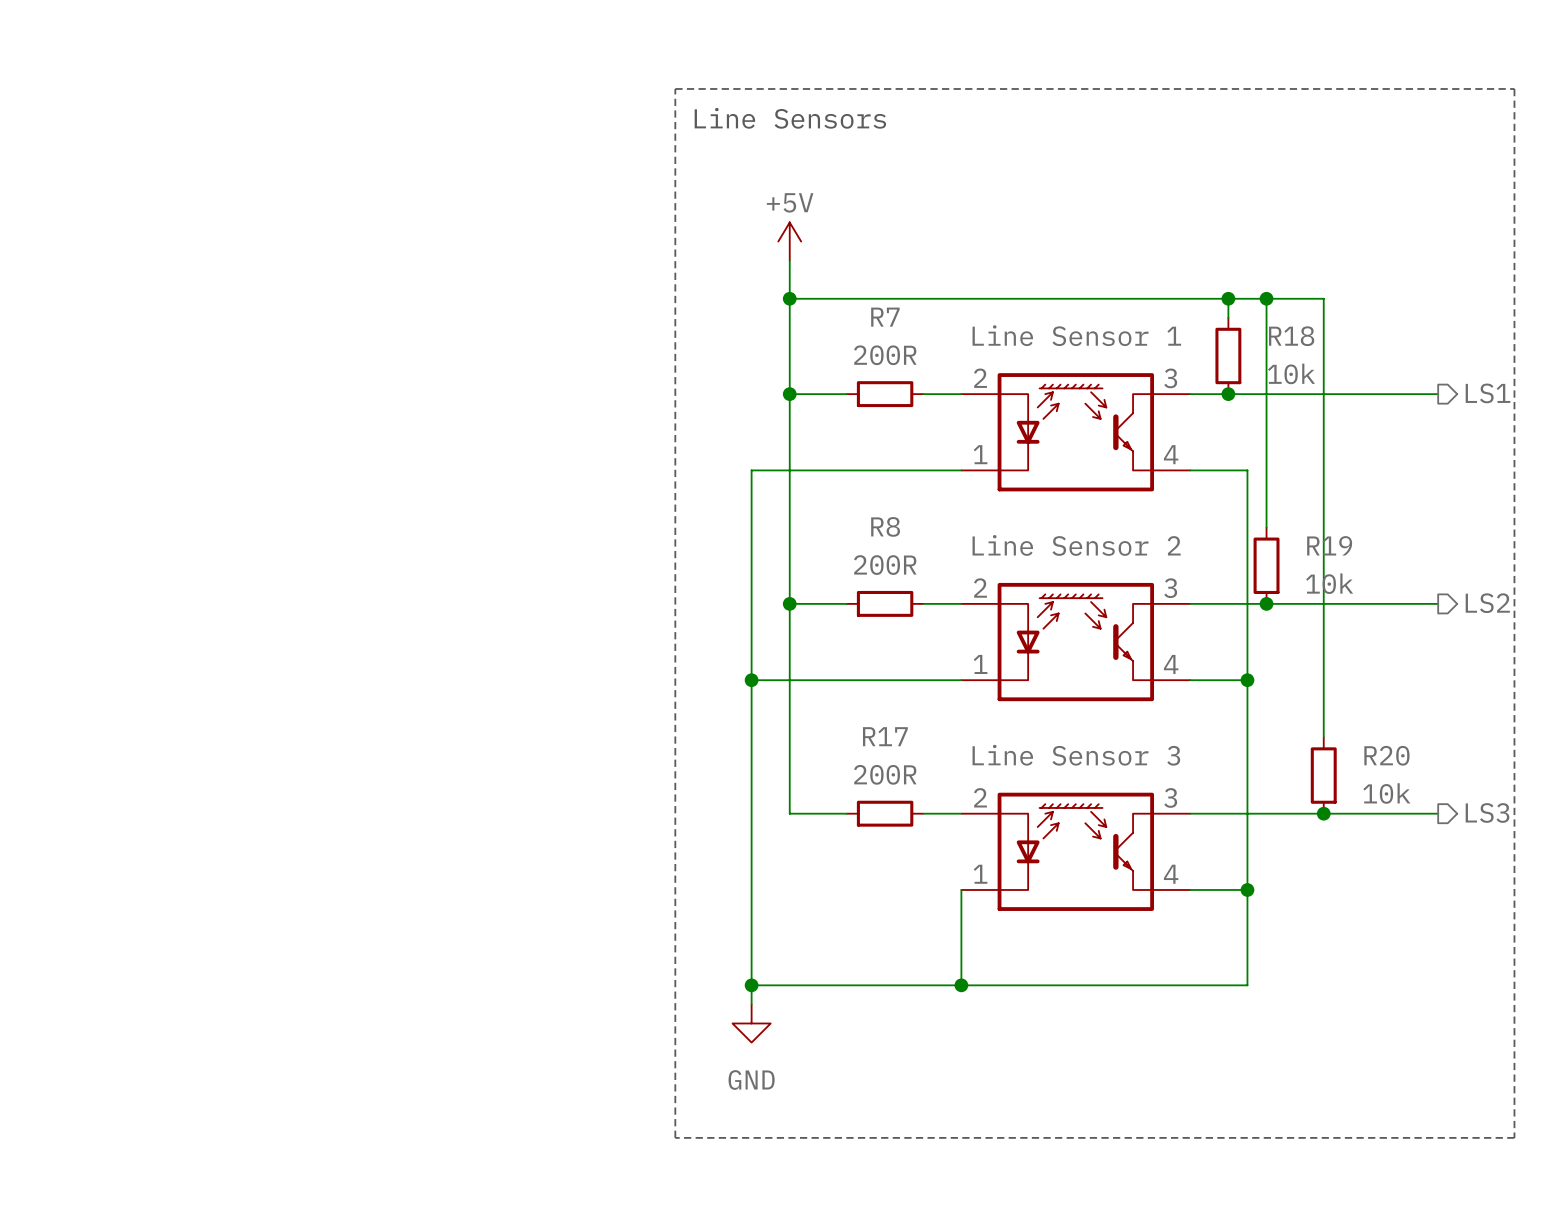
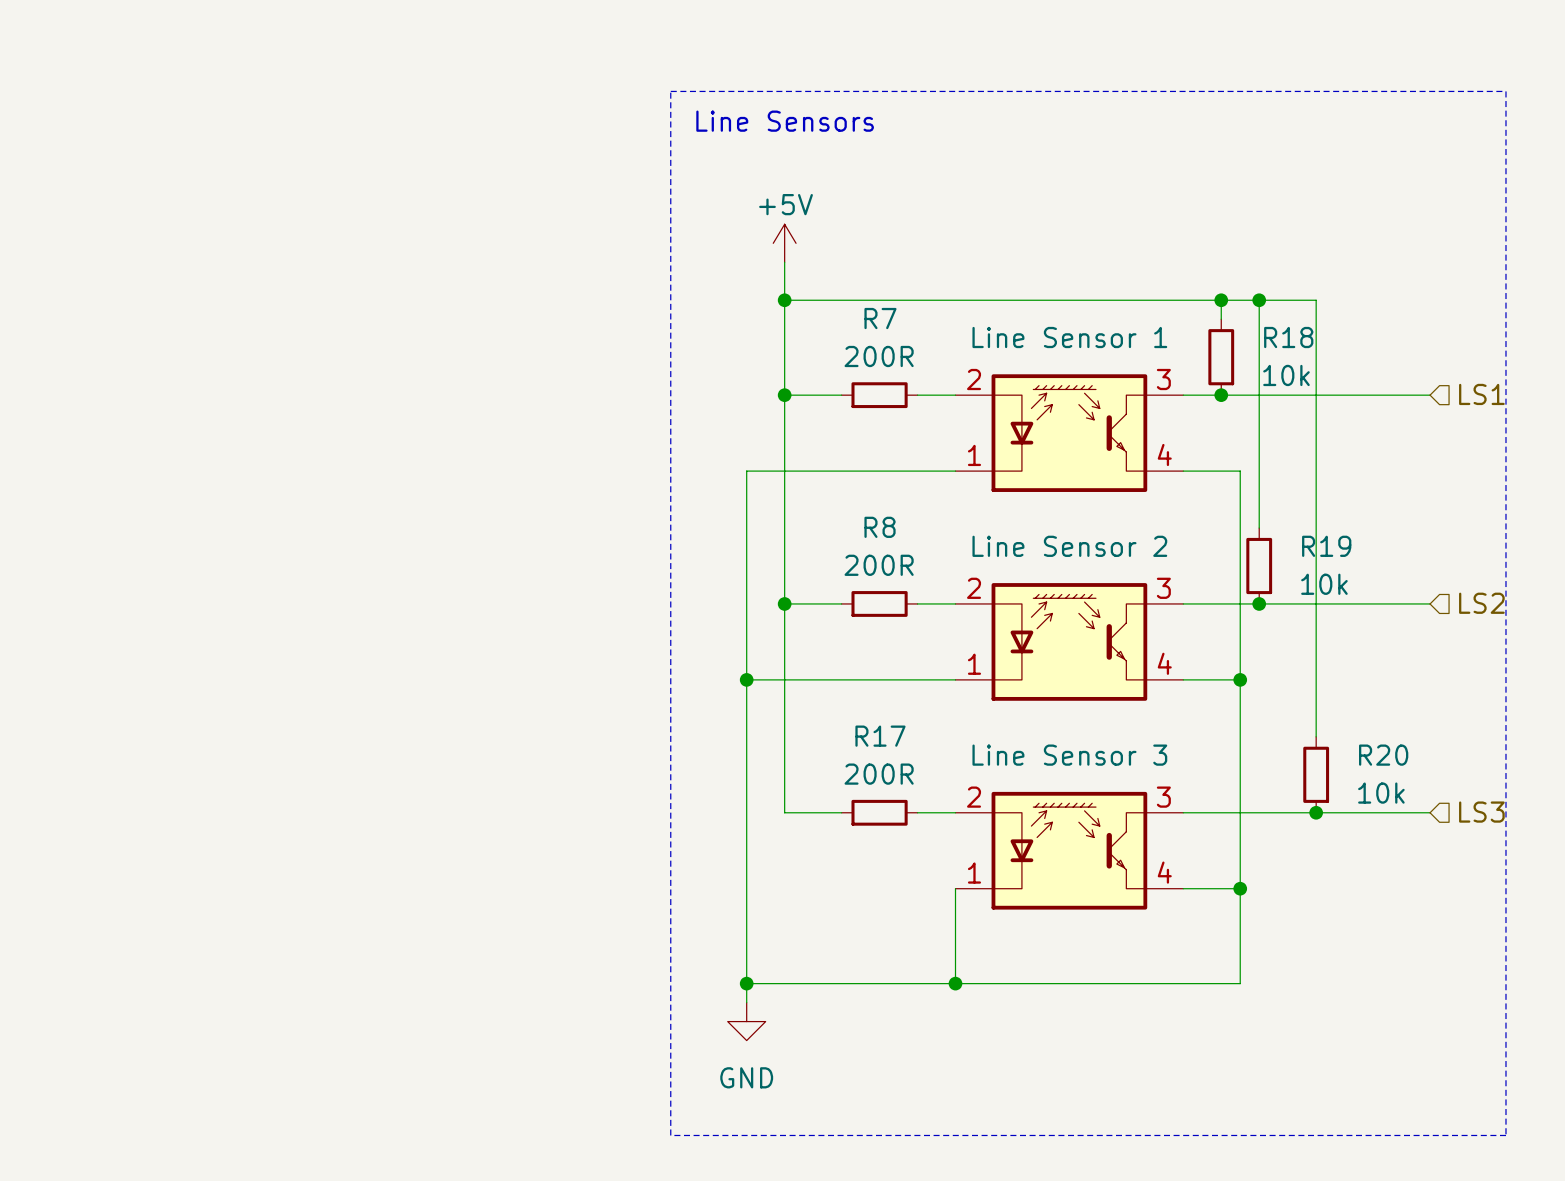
hierarchical label shape: output (1487, 393) -> input (1481, 394)
hierarchical label shape: output (1487, 603) -> input (1481, 603)
hierarchical label shape: output (1487, 812) -> input (1481, 812)

